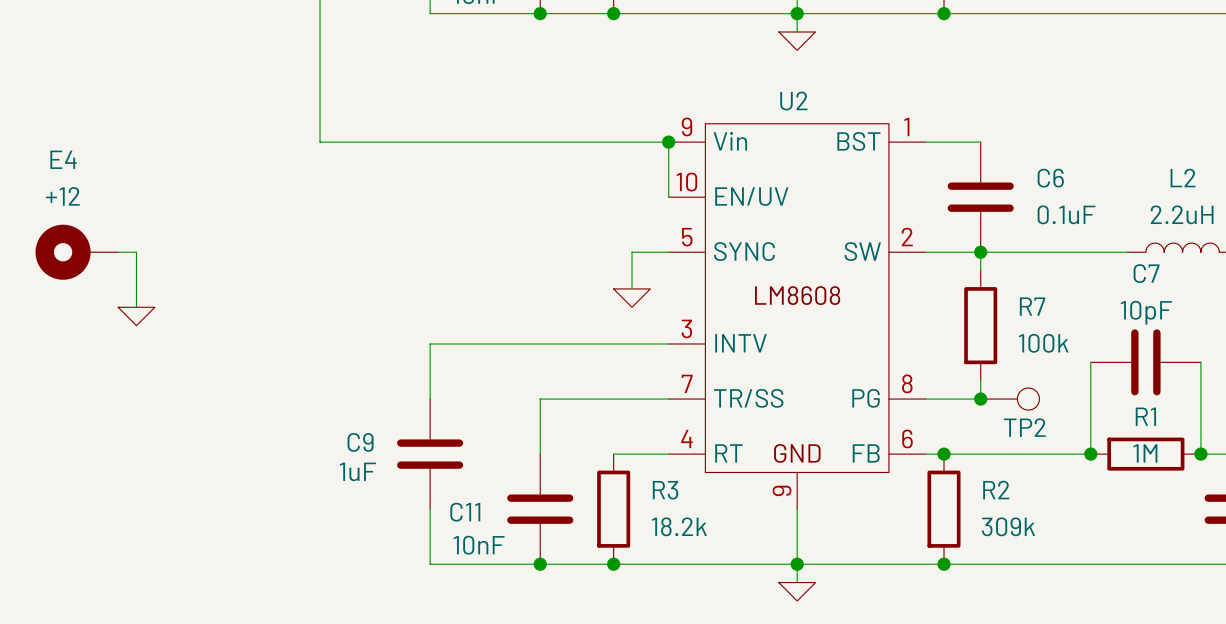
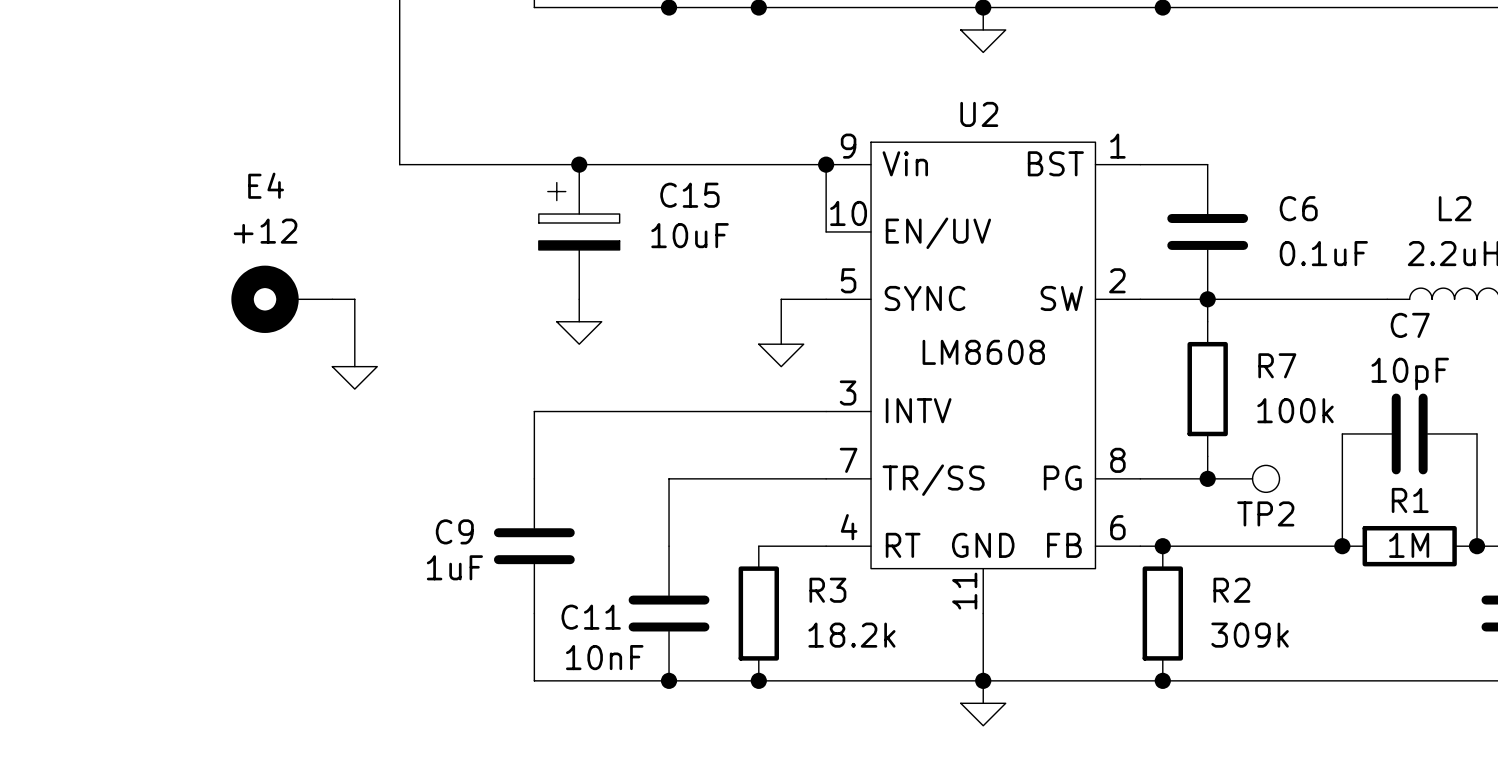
junction: none -> (579, 164)
C15: none -> 10uF (579, 231)
E4 position: (76, 252) -> (281, 299)
wire: (118, 252) (136, 252) (136, 307) -> (332, 299) (354, 299) (354, 366)
wire: none -> (579, 299) (579, 321)
power symbol: none -> (579, 332)
power symbol position: (136, 316) -> (354, 377)
U2 pin number: 9 (782, 490) -> 11 (964, 591)

